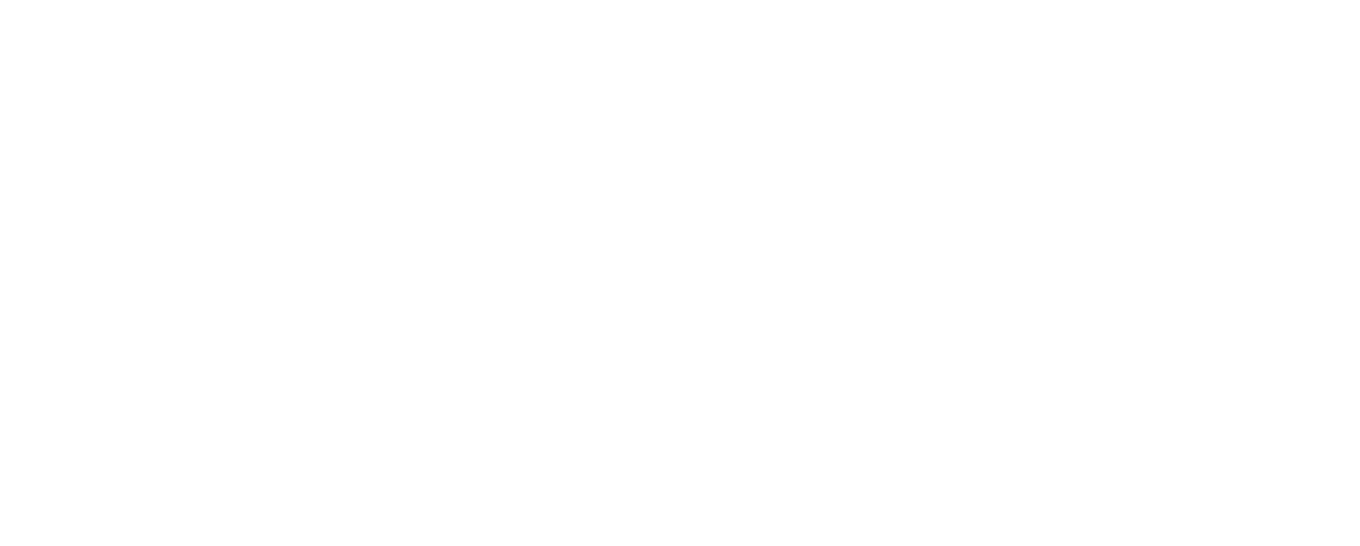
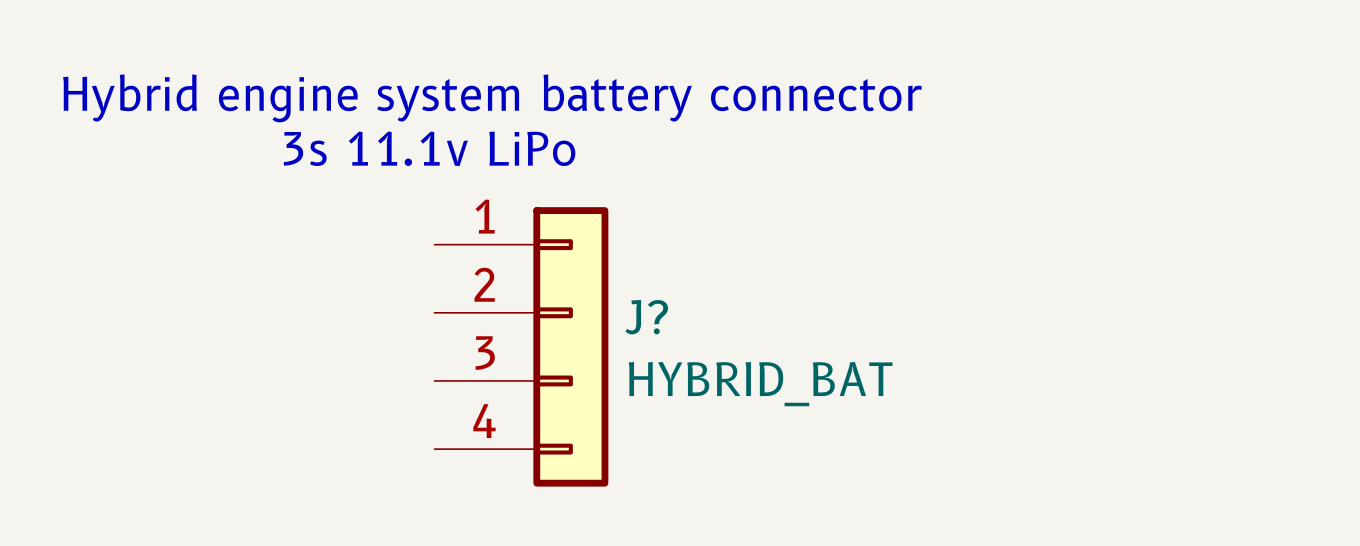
text: none -> Hybrid engine system battery connector (492, 98)
text: none -> 3s 11.1v LiPo (429, 148)
J?: none -> HYBRID_BAT (521, 346)

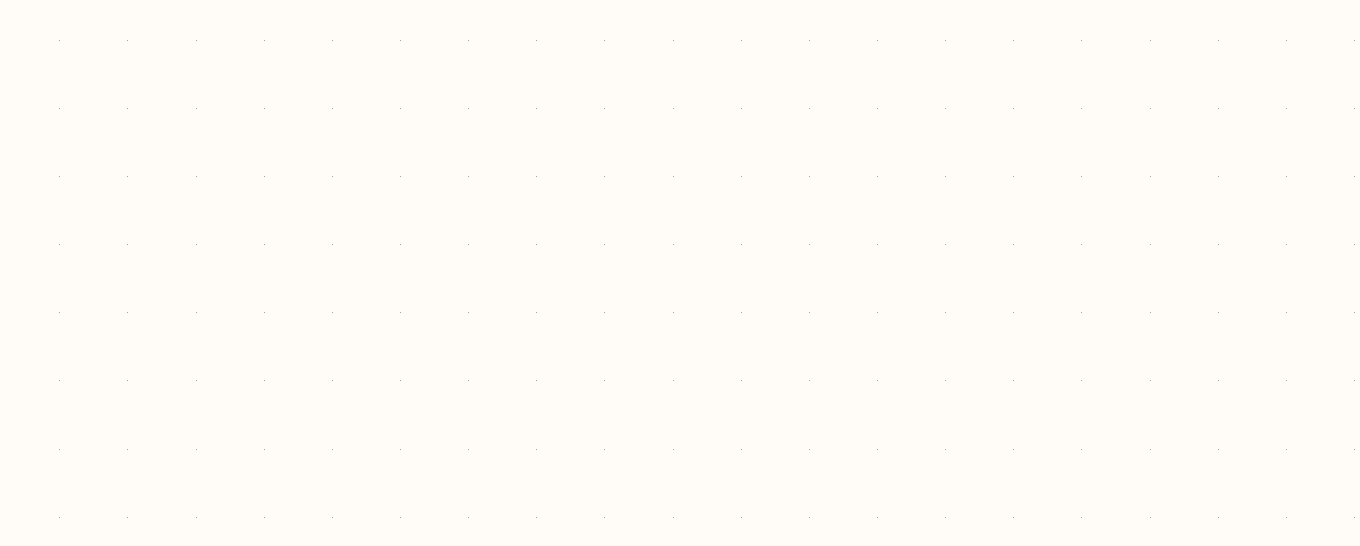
text: Hybrid engine system battery connector (492, 98) -> none
text: 3s 11.1v LiPo (429, 148) -> none
J?: HYBRID_BAT (521, 346) -> none

